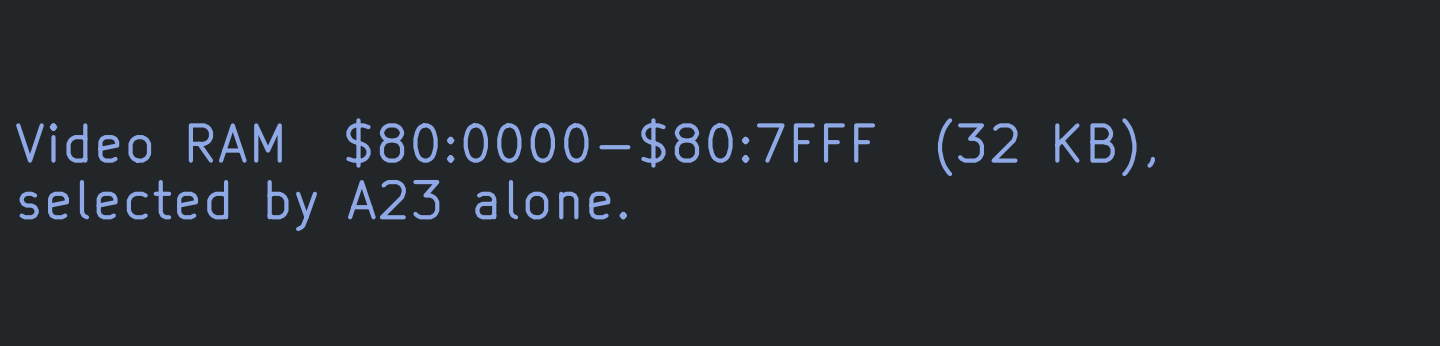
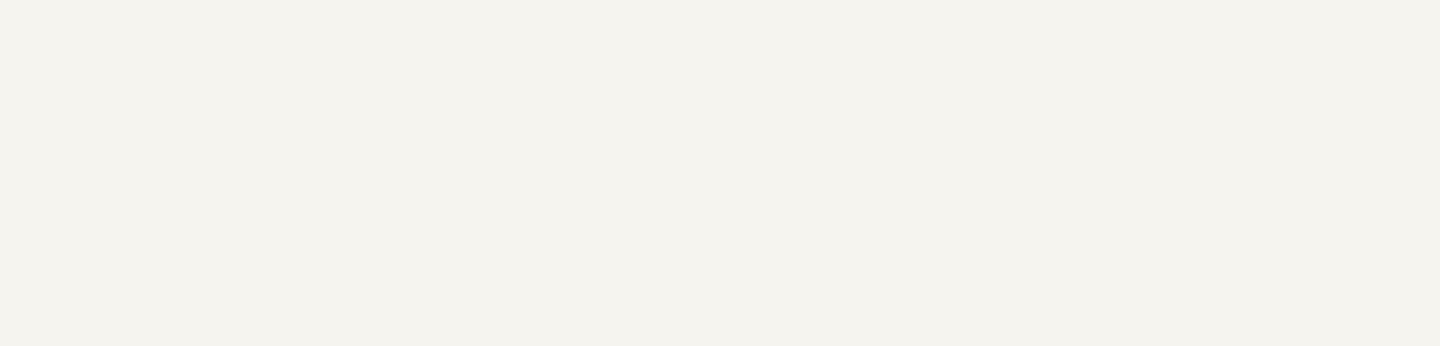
text: Video RAM $80:0000-$80:7FFF (32 KB), (585, 147) -> none
text: selected by A23 alone. (323, 205) -> none

